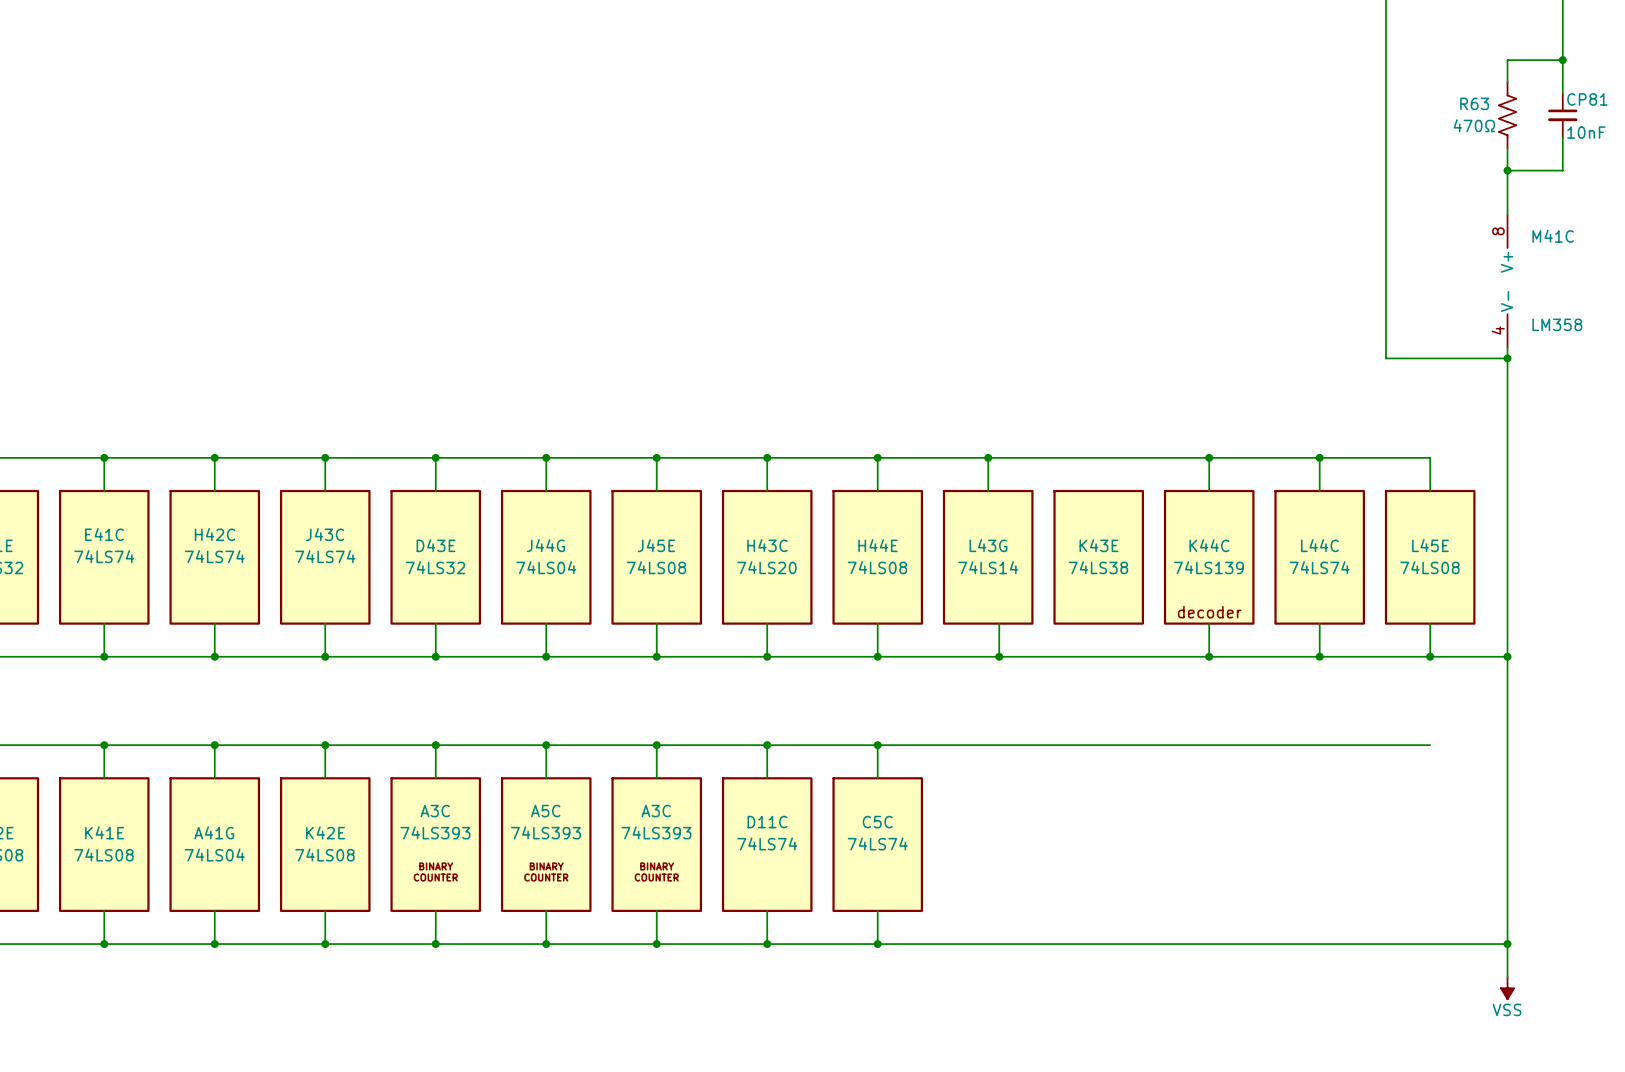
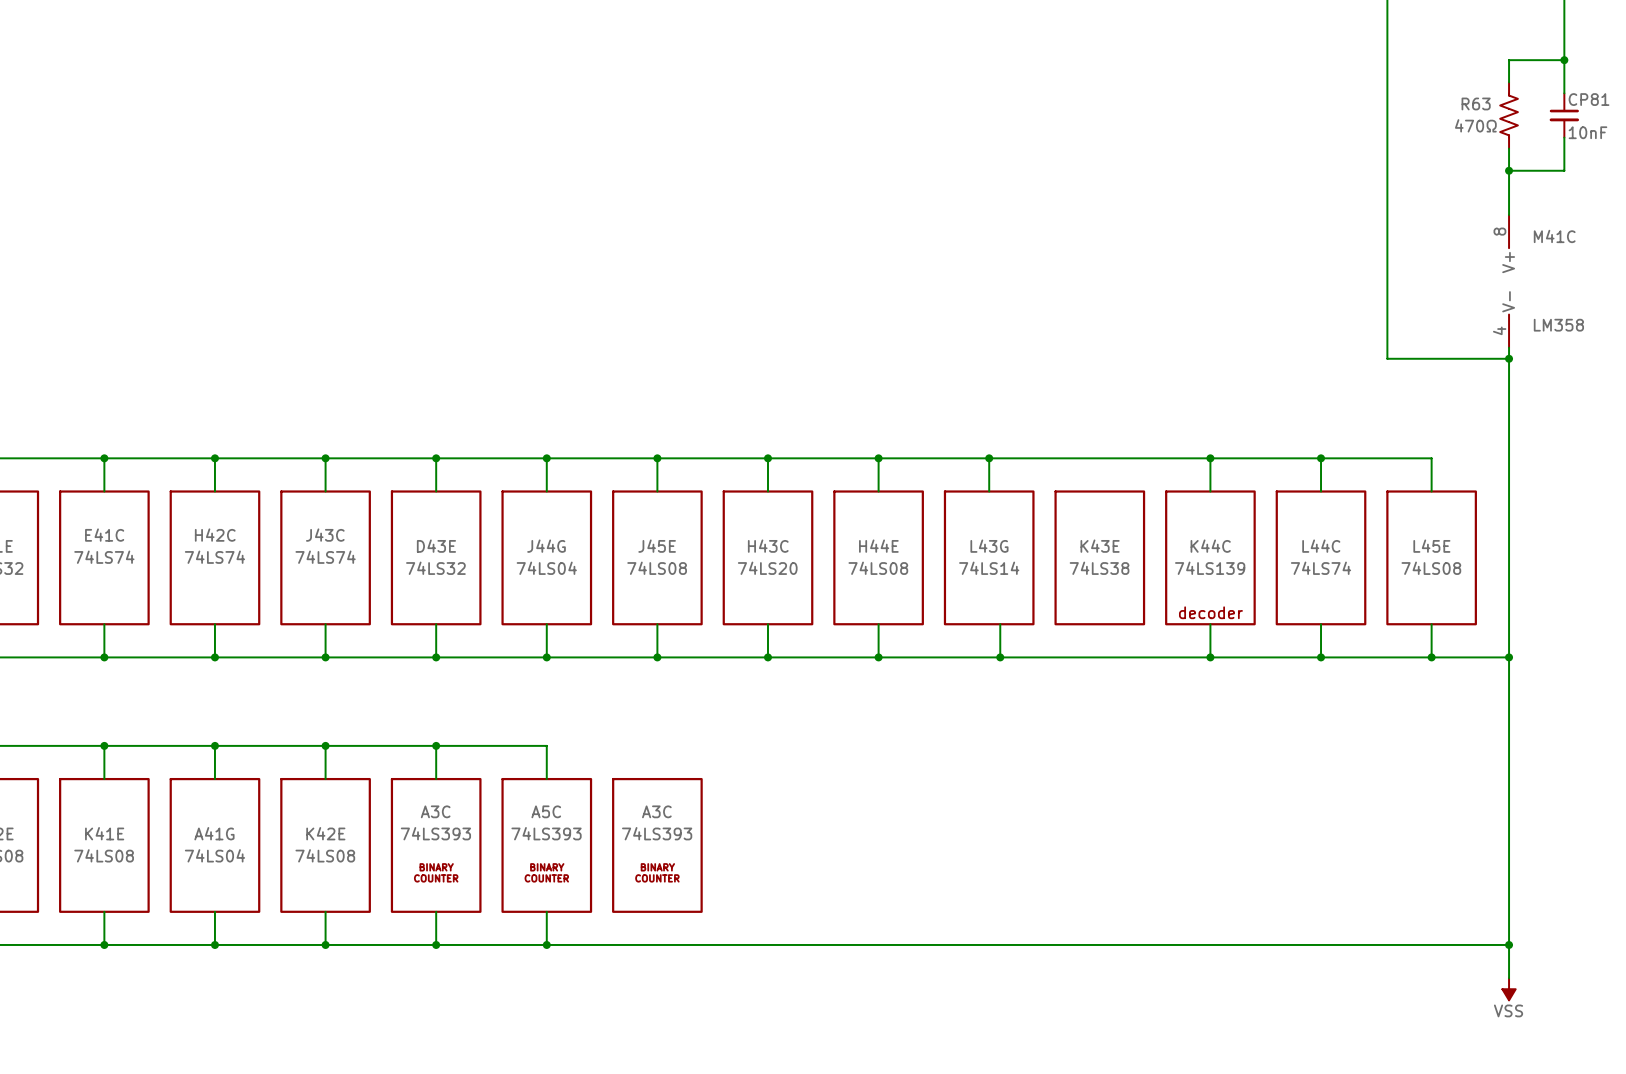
wire: (546, 745) (1430, 745) -> none
junction: (546, 745) -> none
wire: (656, 745) (656, 778) -> none
junction: (656, 745) -> none
wire: (767, 745) (767, 778) -> none
junction: (767, 745) -> none
wire: (877, 745) (877, 778) -> none
junction: (877, 745) -> none
D11C: 74LS74 (767, 844) -> none
C5C: 74LS74 (877, 844) -> none
wire: (656, 910) (656, 944) -> none
wire: (767, 910) (767, 944) -> none
wire: (877, 910) (877, 944) -> none
junction: (656, 944) -> none
junction: (767, 944) -> none
junction: (877, 944) -> none

